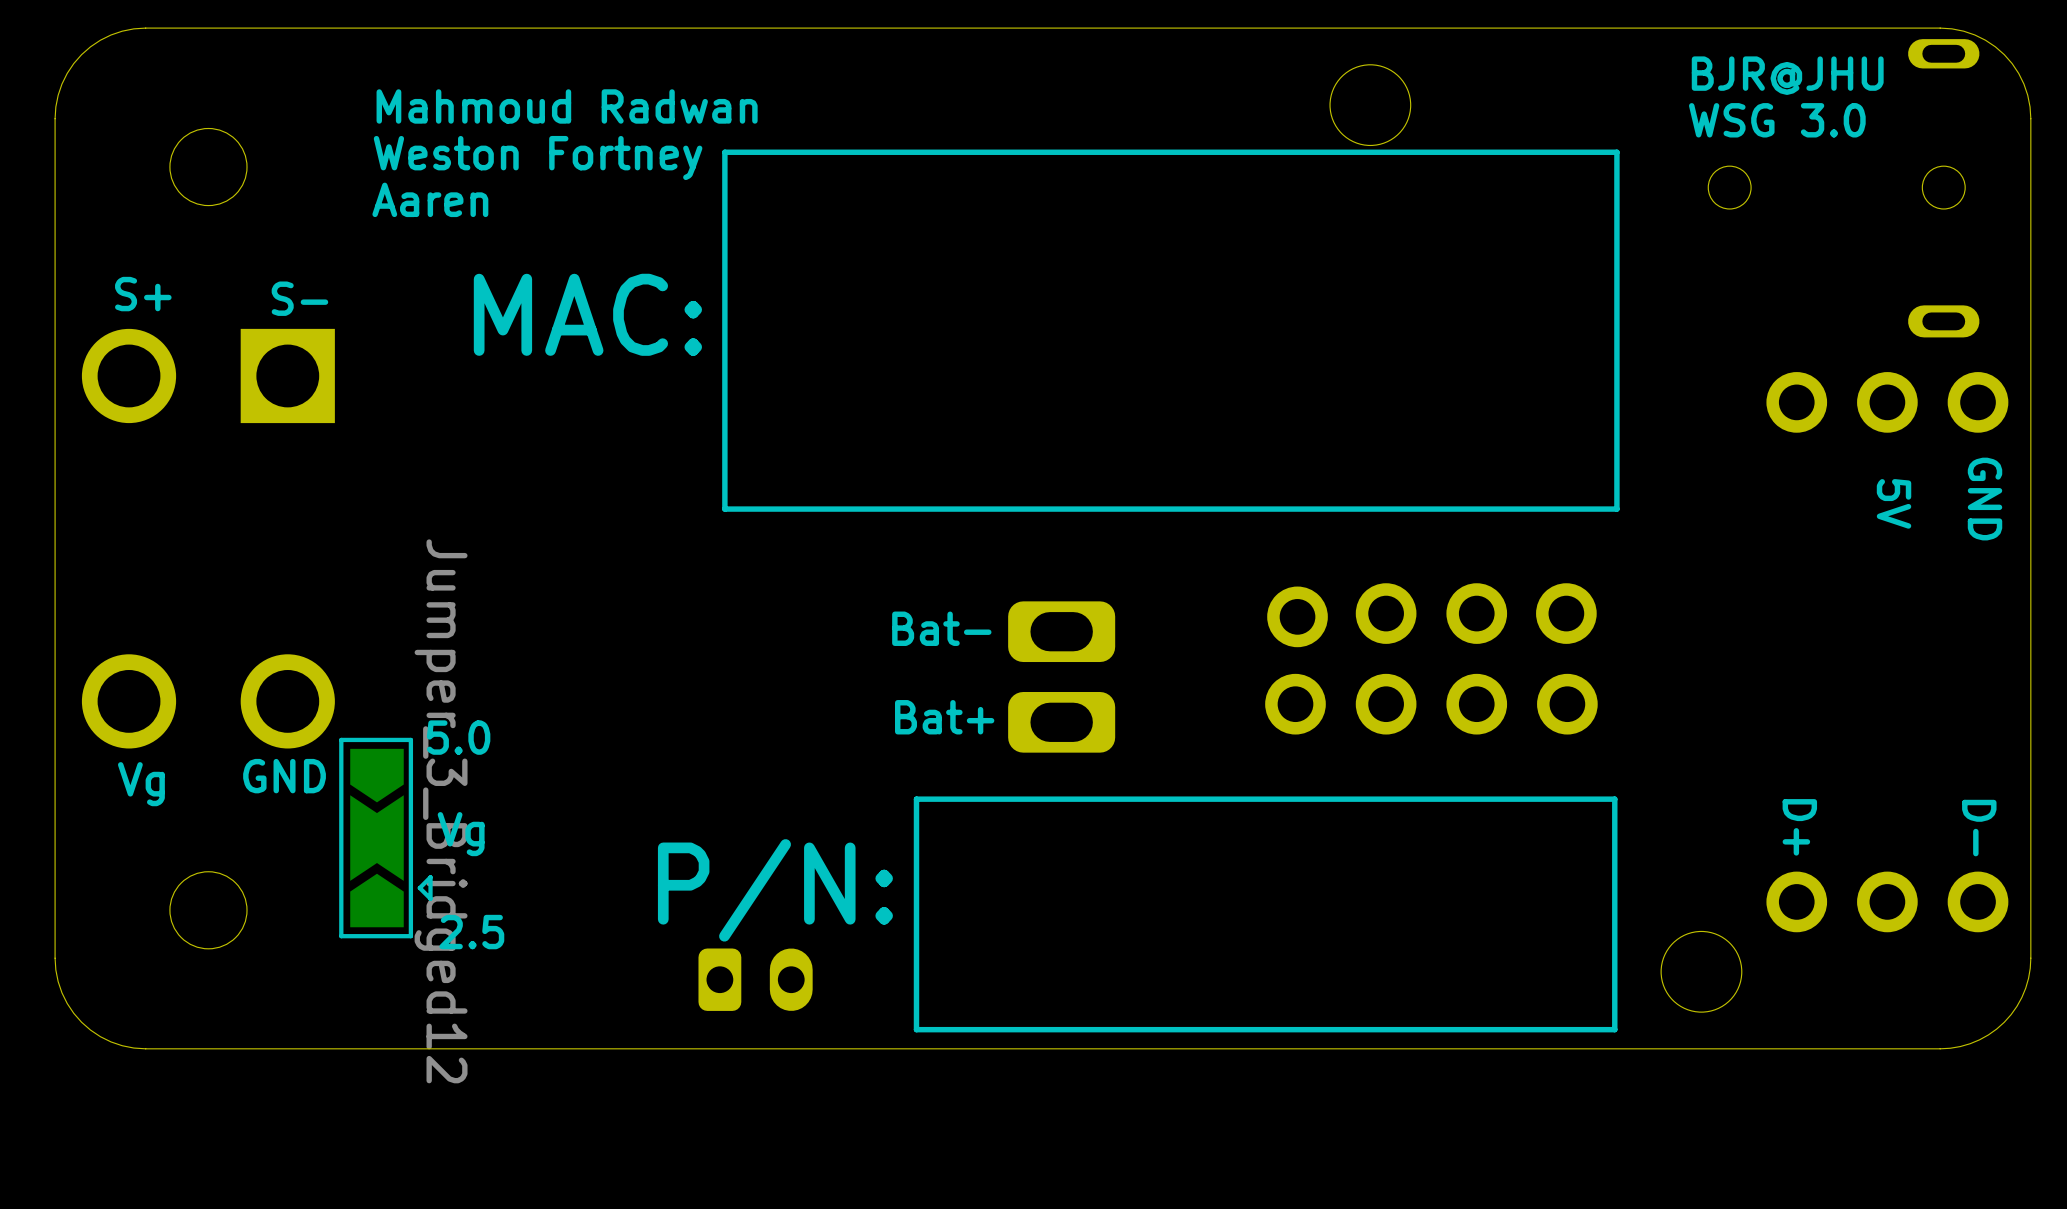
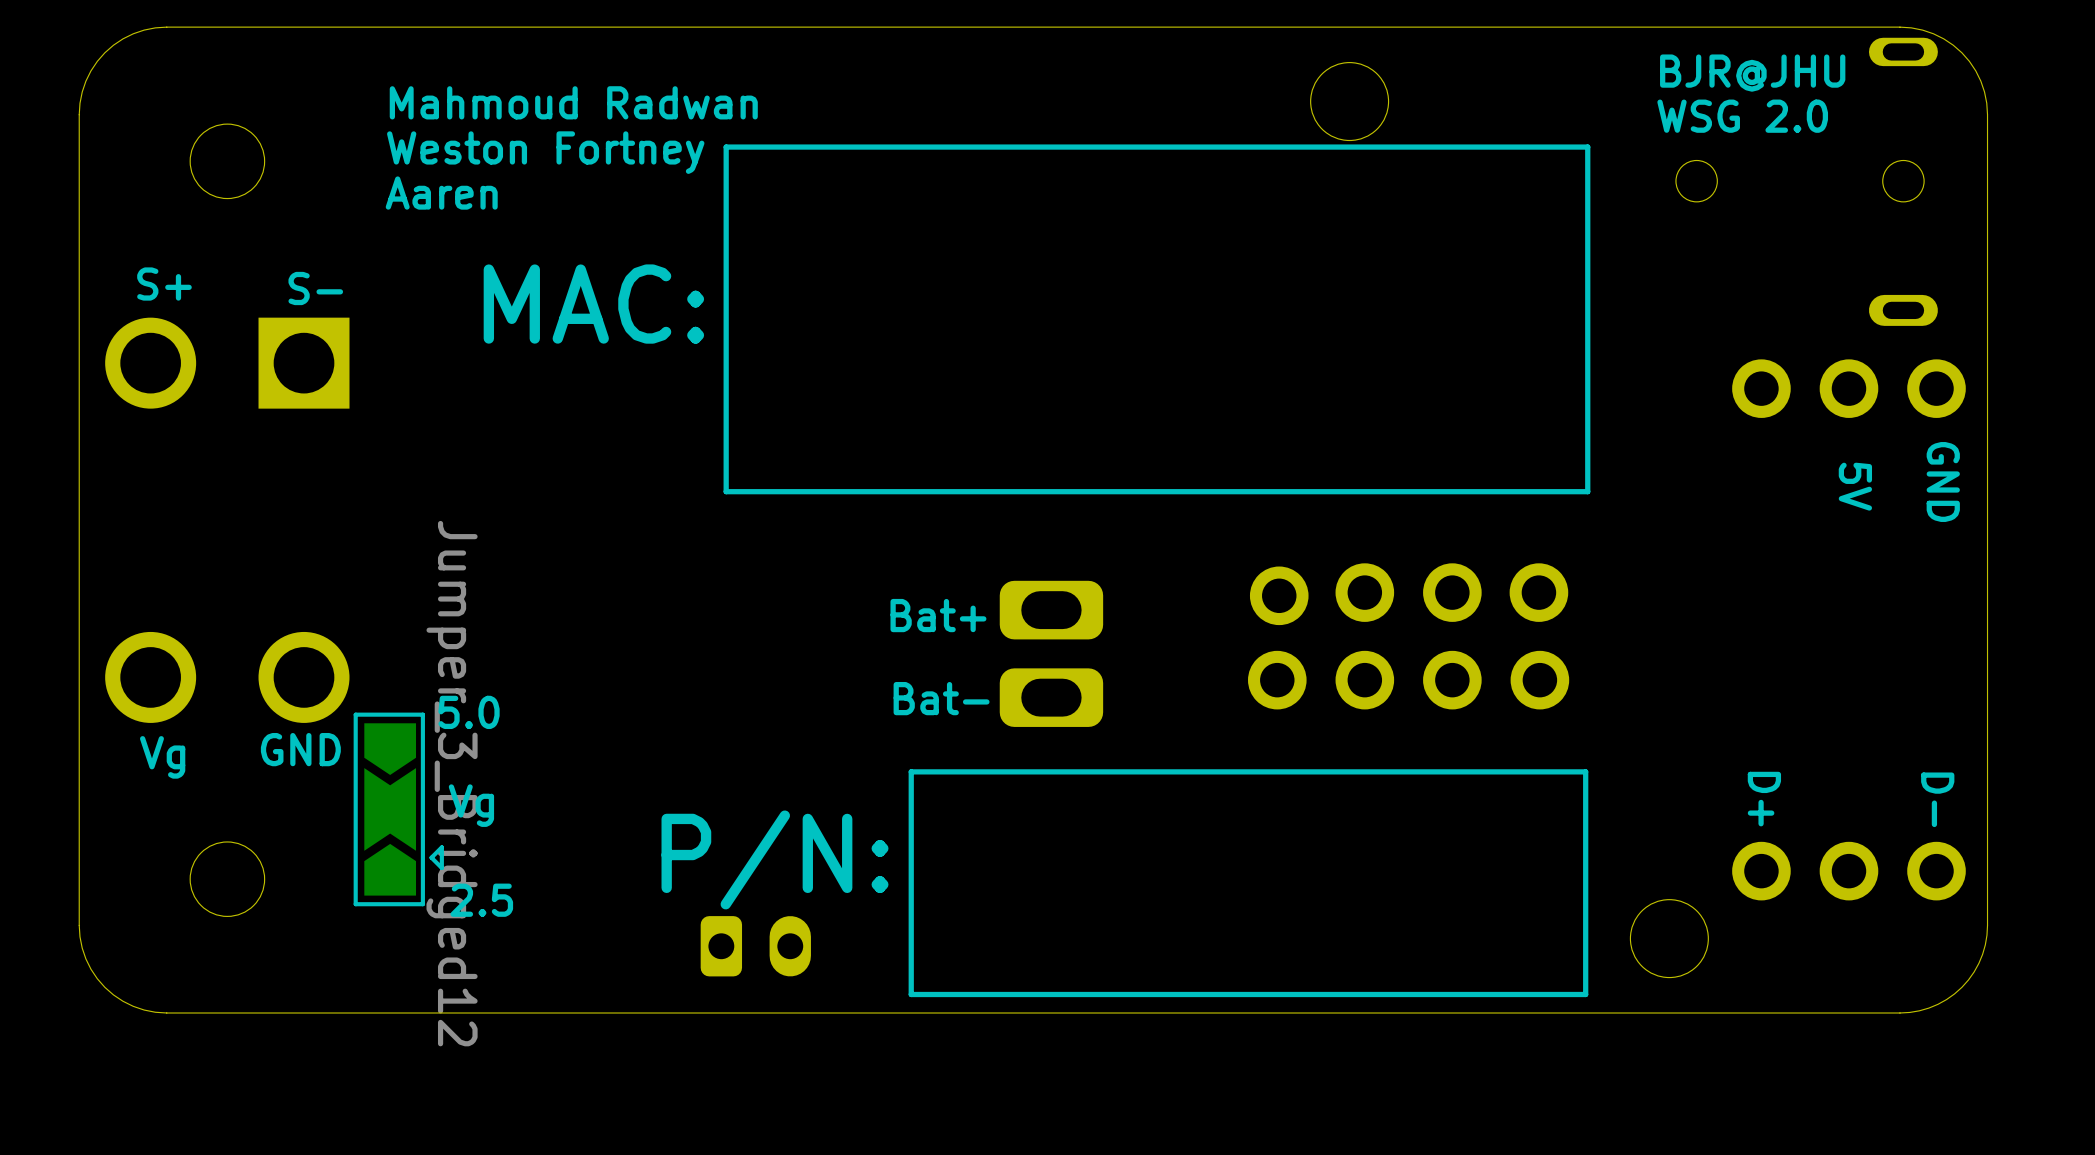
text: WSG 3.0 (1777, 120) -> WSG 2.0 (1742, 116)
text: Bat- (941, 628) -> Bat+ (938, 615)
text: Bat+ (944, 717) -> Bat- (941, 698)

